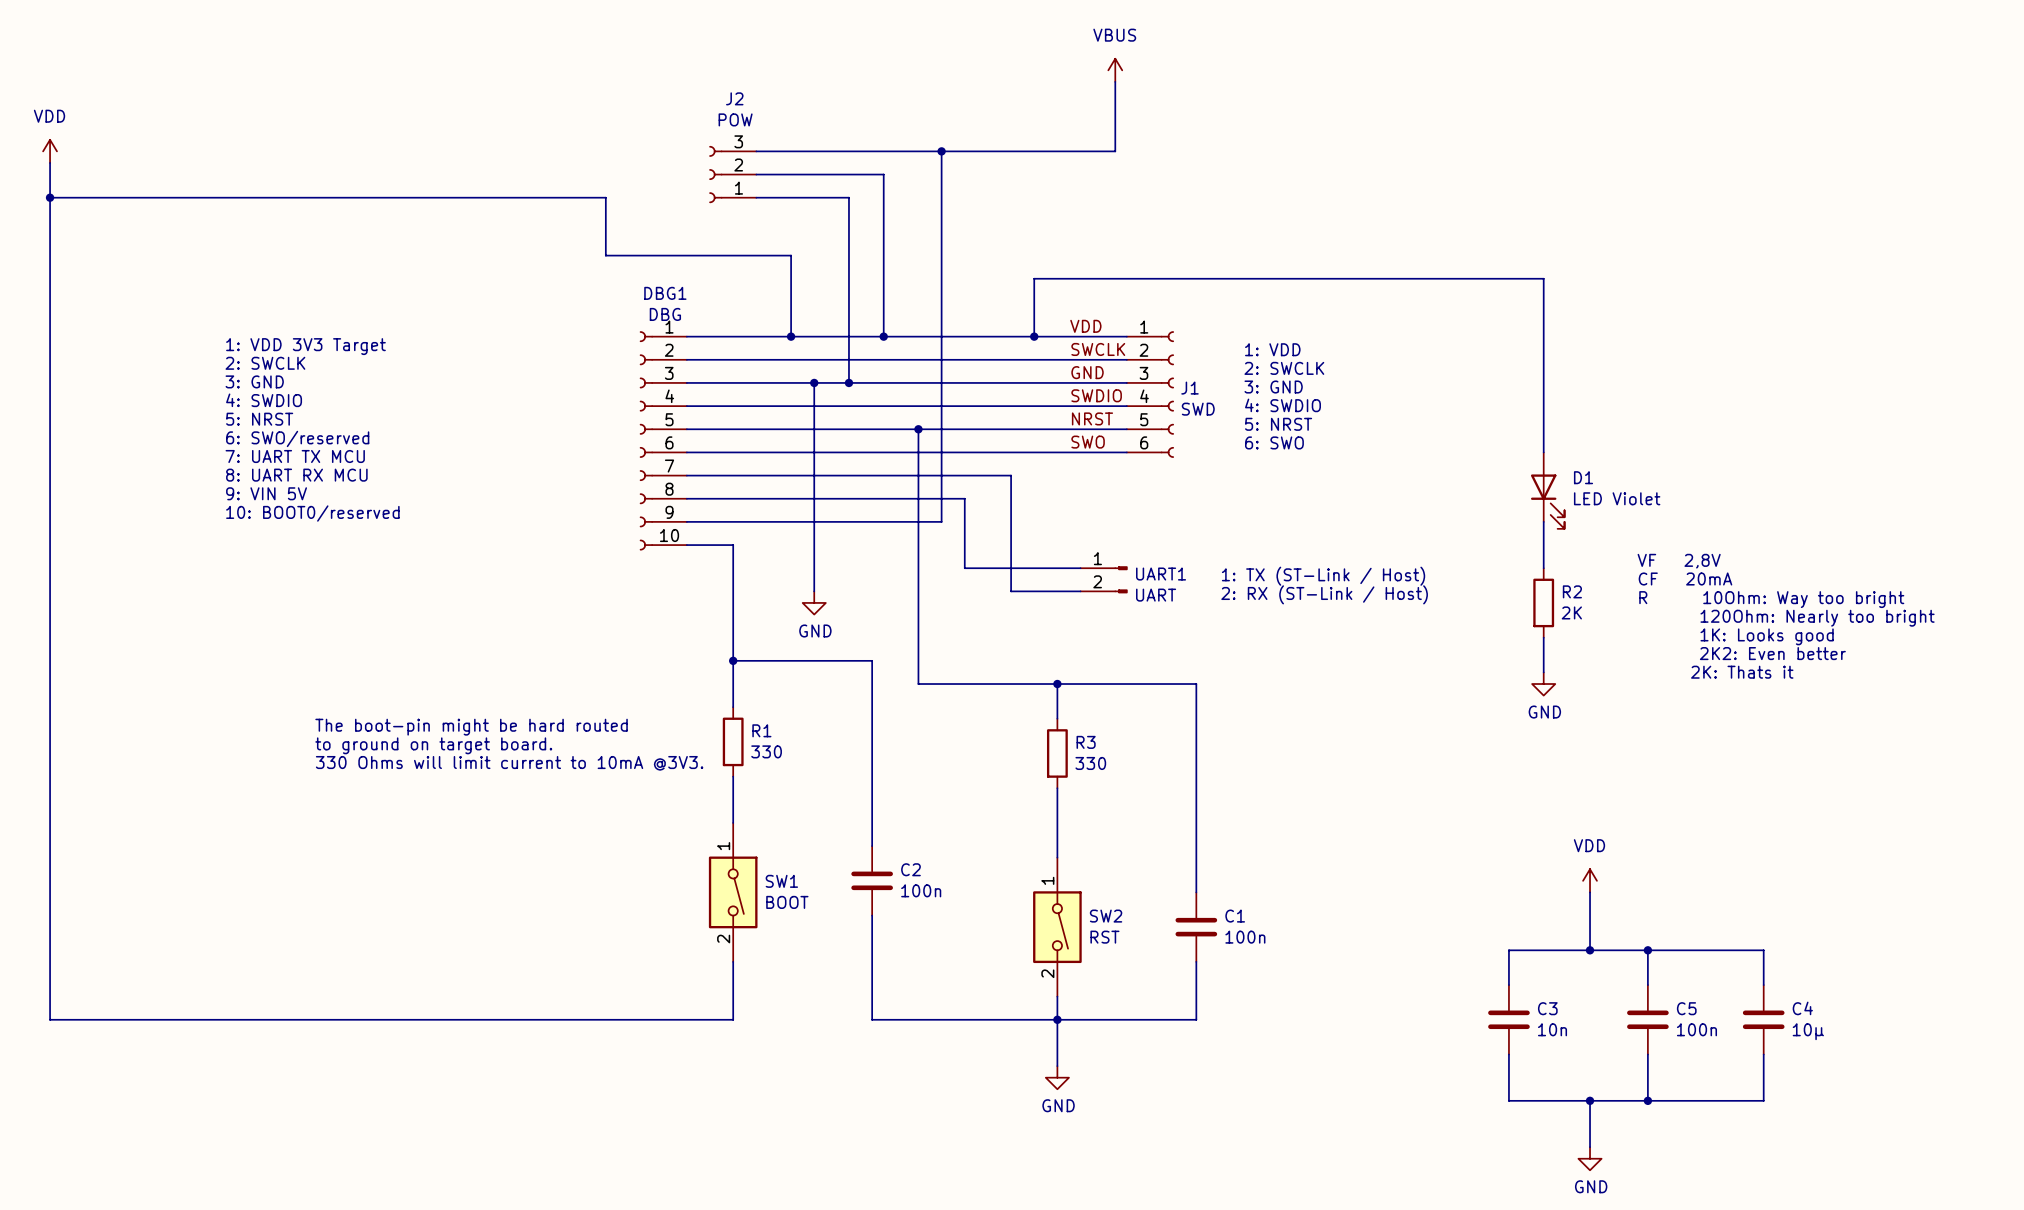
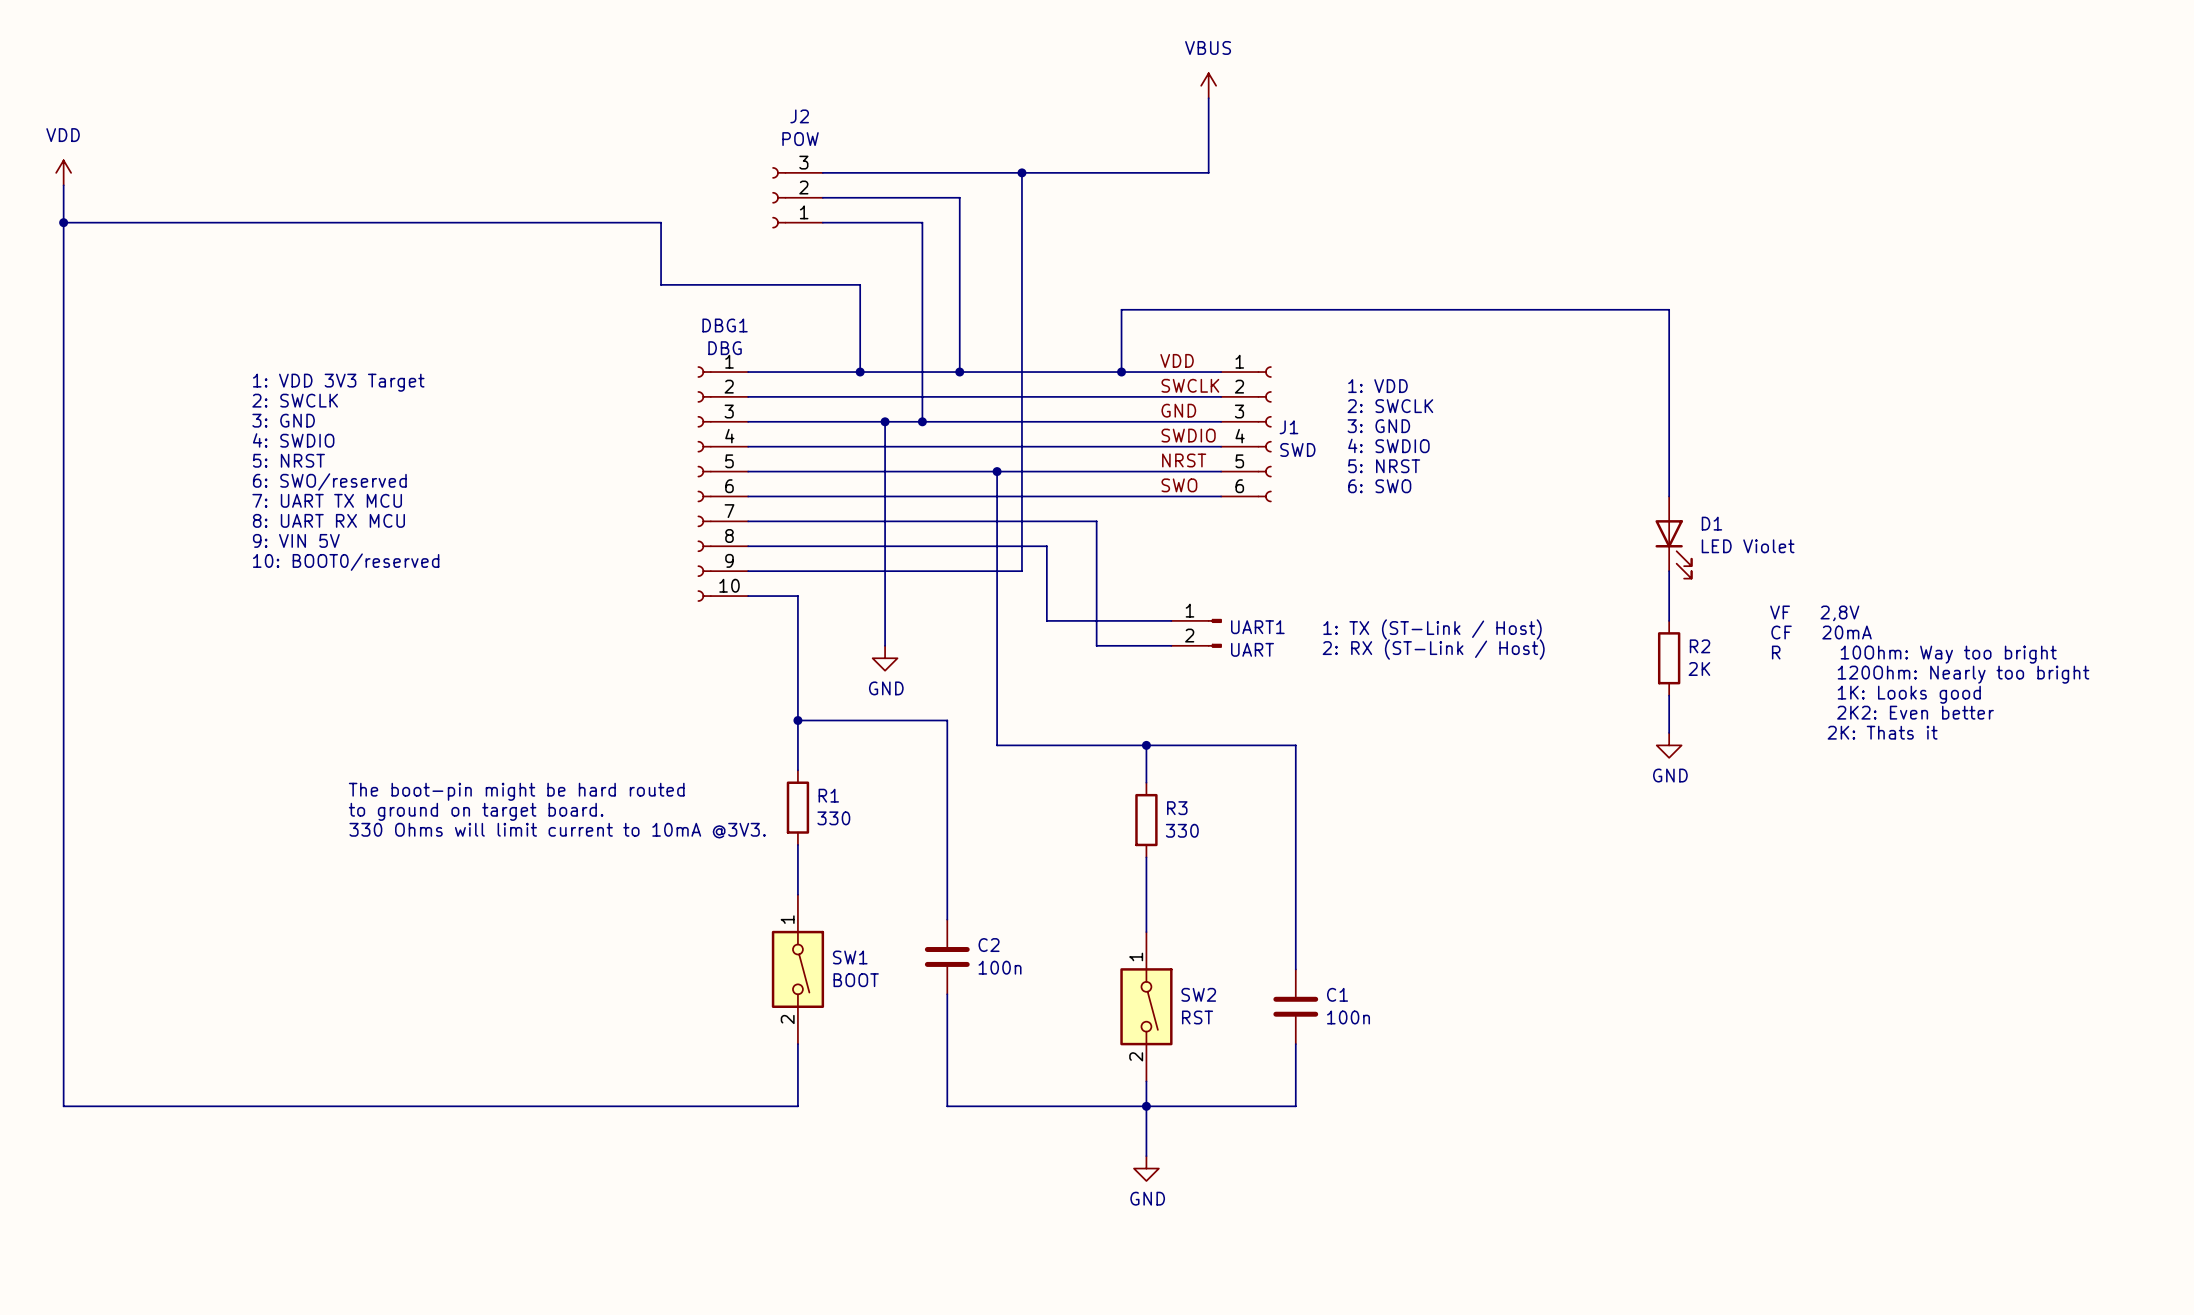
power symbol: VDD (1590, 880) -> none
wire: (1590, 892) (1590, 950) -> none
junction: (1590, 950) -> none
wire: (1647, 950) (1647, 985) -> none
junction: (1647, 950) -> none
wire: (1508, 985) (1508, 950) (1763, 950) (1763, 985) -> none
C3: 10n (1508, 1019) -> none
C5: 100n (1647, 1019) -> none
C4: 10µ (1763, 1019) -> none
wire: (1508, 1054) (1508, 1100) (1763, 1100) (1763, 1054) -> none
wire: (1647, 1054) (1647, 1100) -> none
wire: (1590, 1100) (1590, 1147) -> none
junction: (1590, 1100) -> none
junction: (1647, 1100) -> none
power symbol: GND (1590, 1158) -> none

